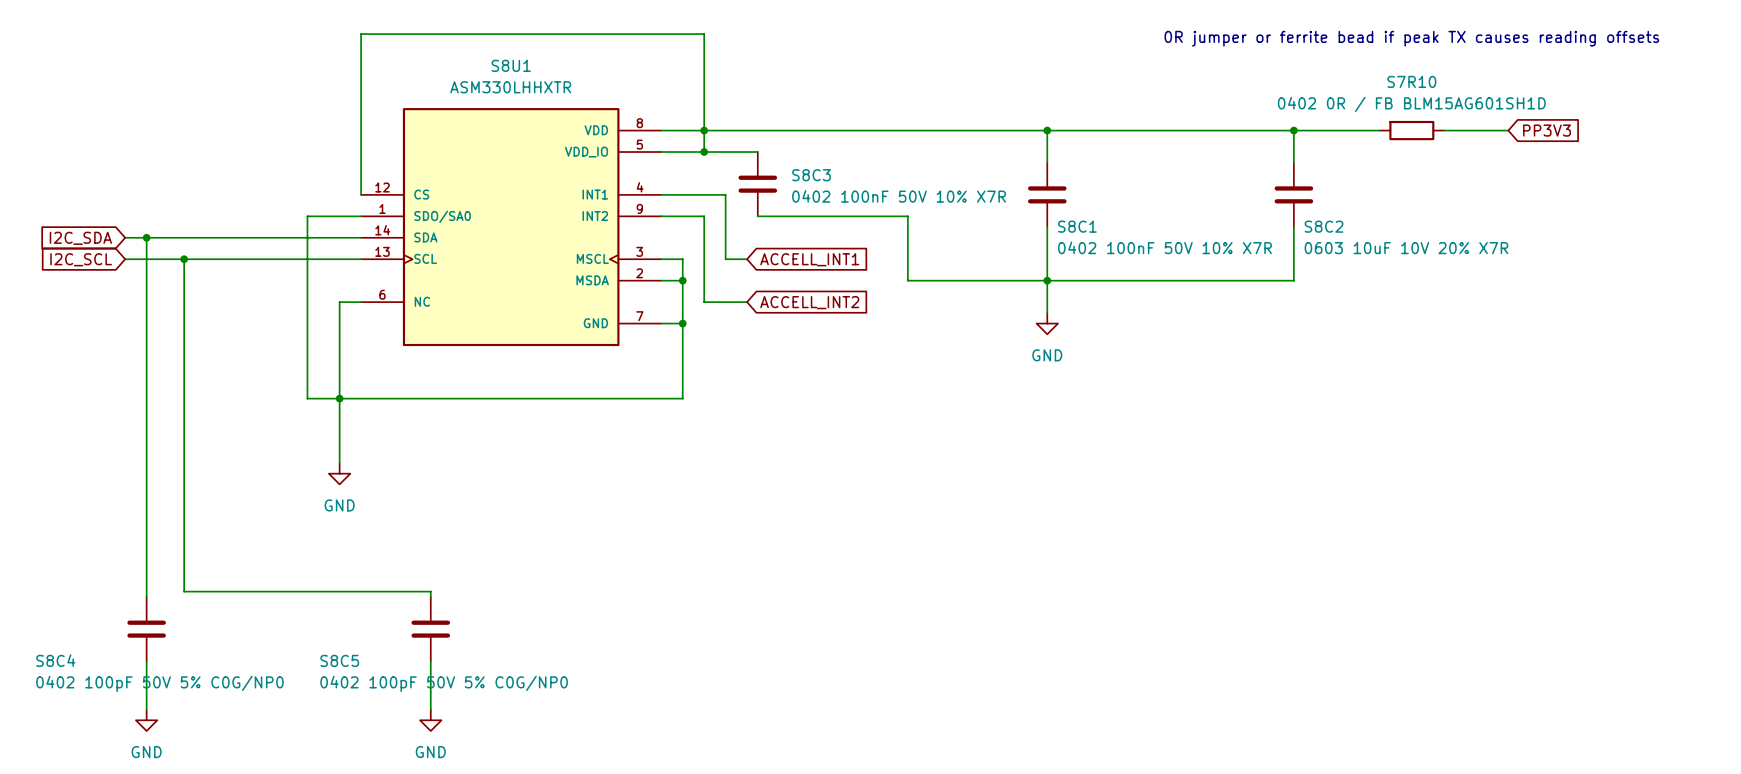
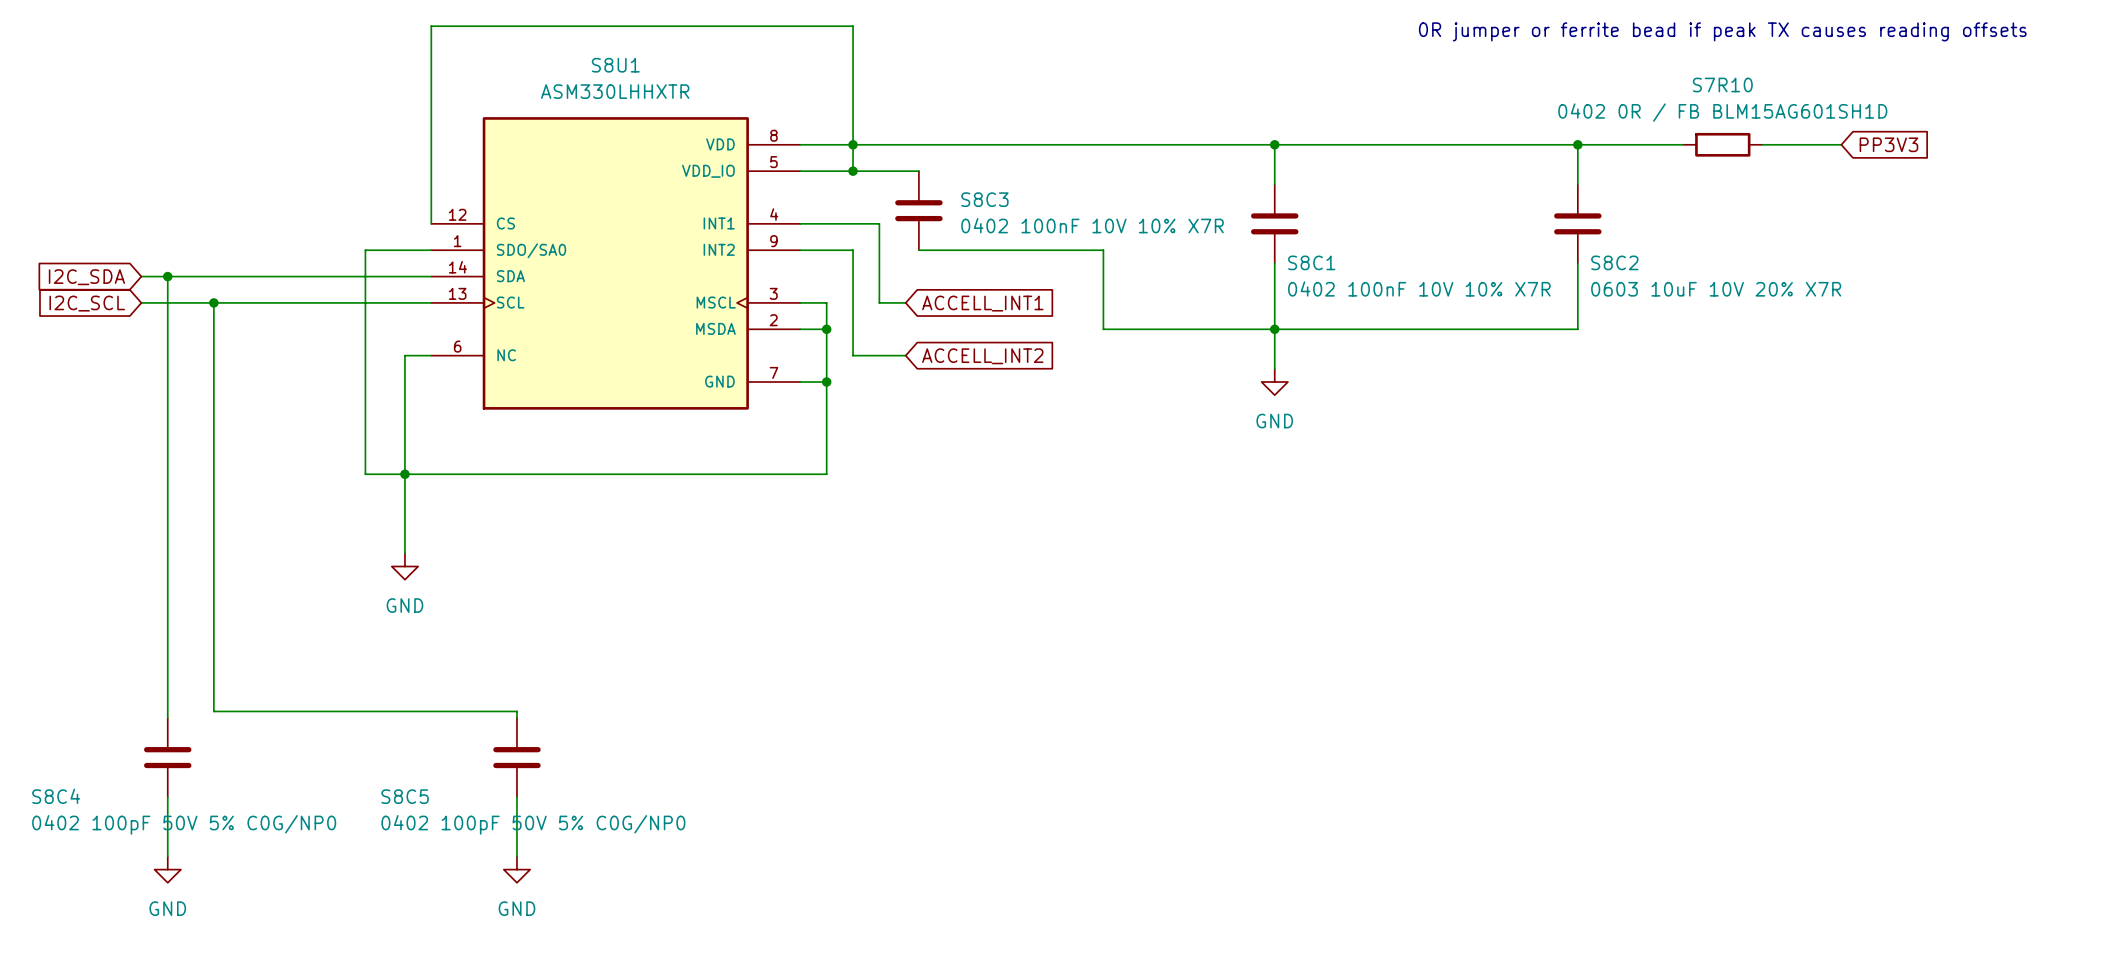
S8C3 value: 0402 100nF 50V 10% X7R (899, 196) -> 0402 100nF 10V 10% X7R (1092, 225)
S8C1 value: 0402 100nF 50V 10% X7R (1164, 247) -> 0402 100nF 10V 10% X7R (1419, 288)

